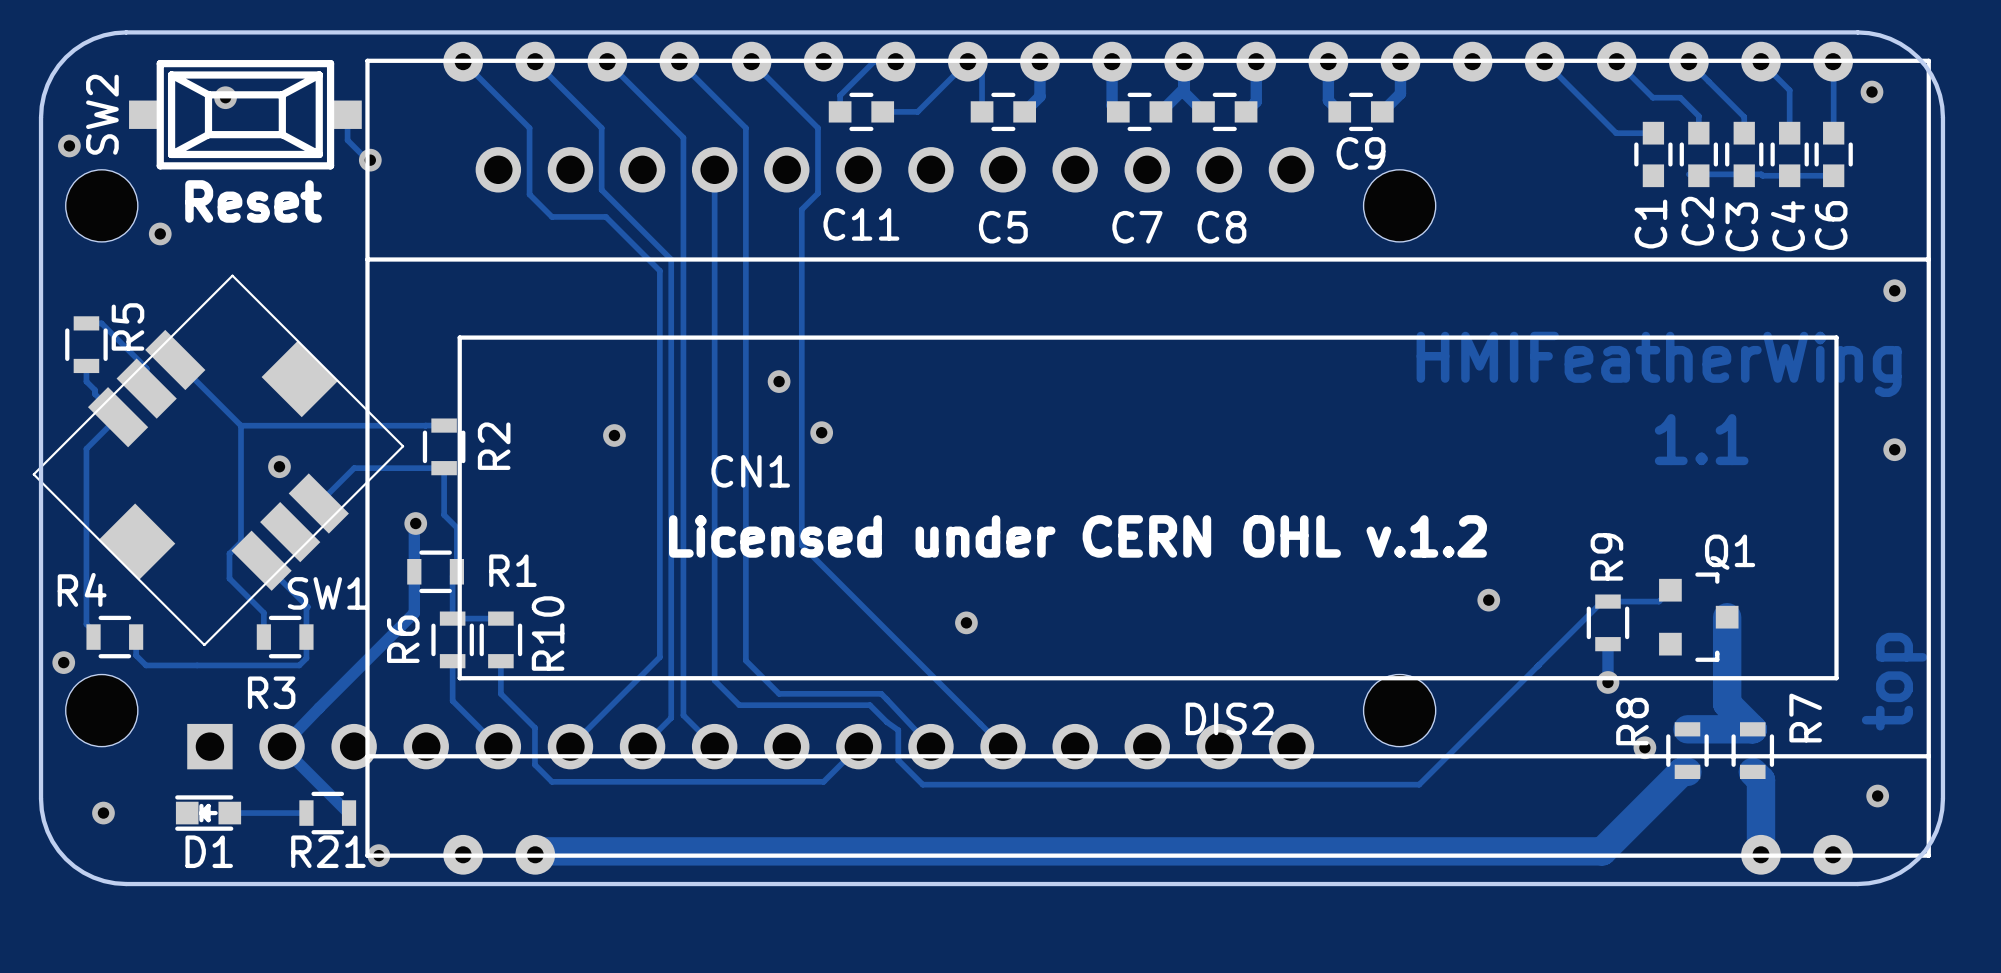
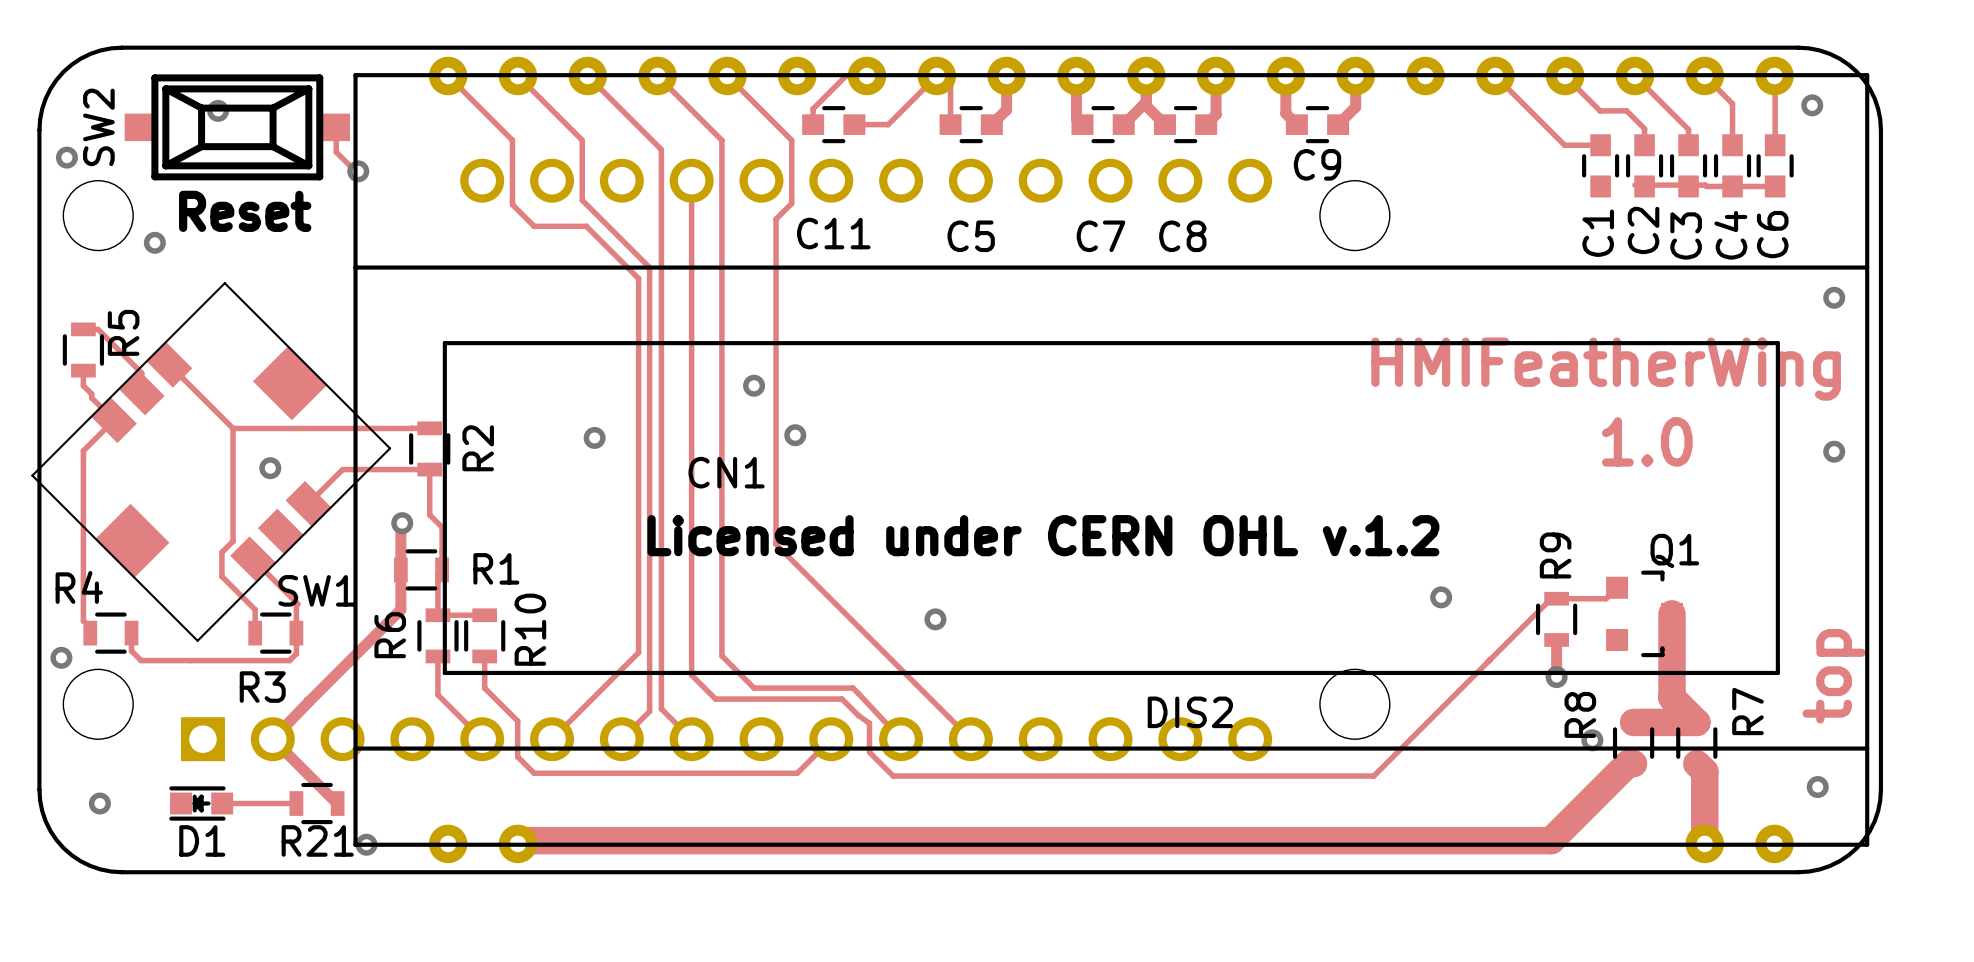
SW1 footprint: [32, 274, 405, 647] -> [31, 282, 392, 642]
text: 1.1 (1701, 439) -> 1.0 (1647, 441)

